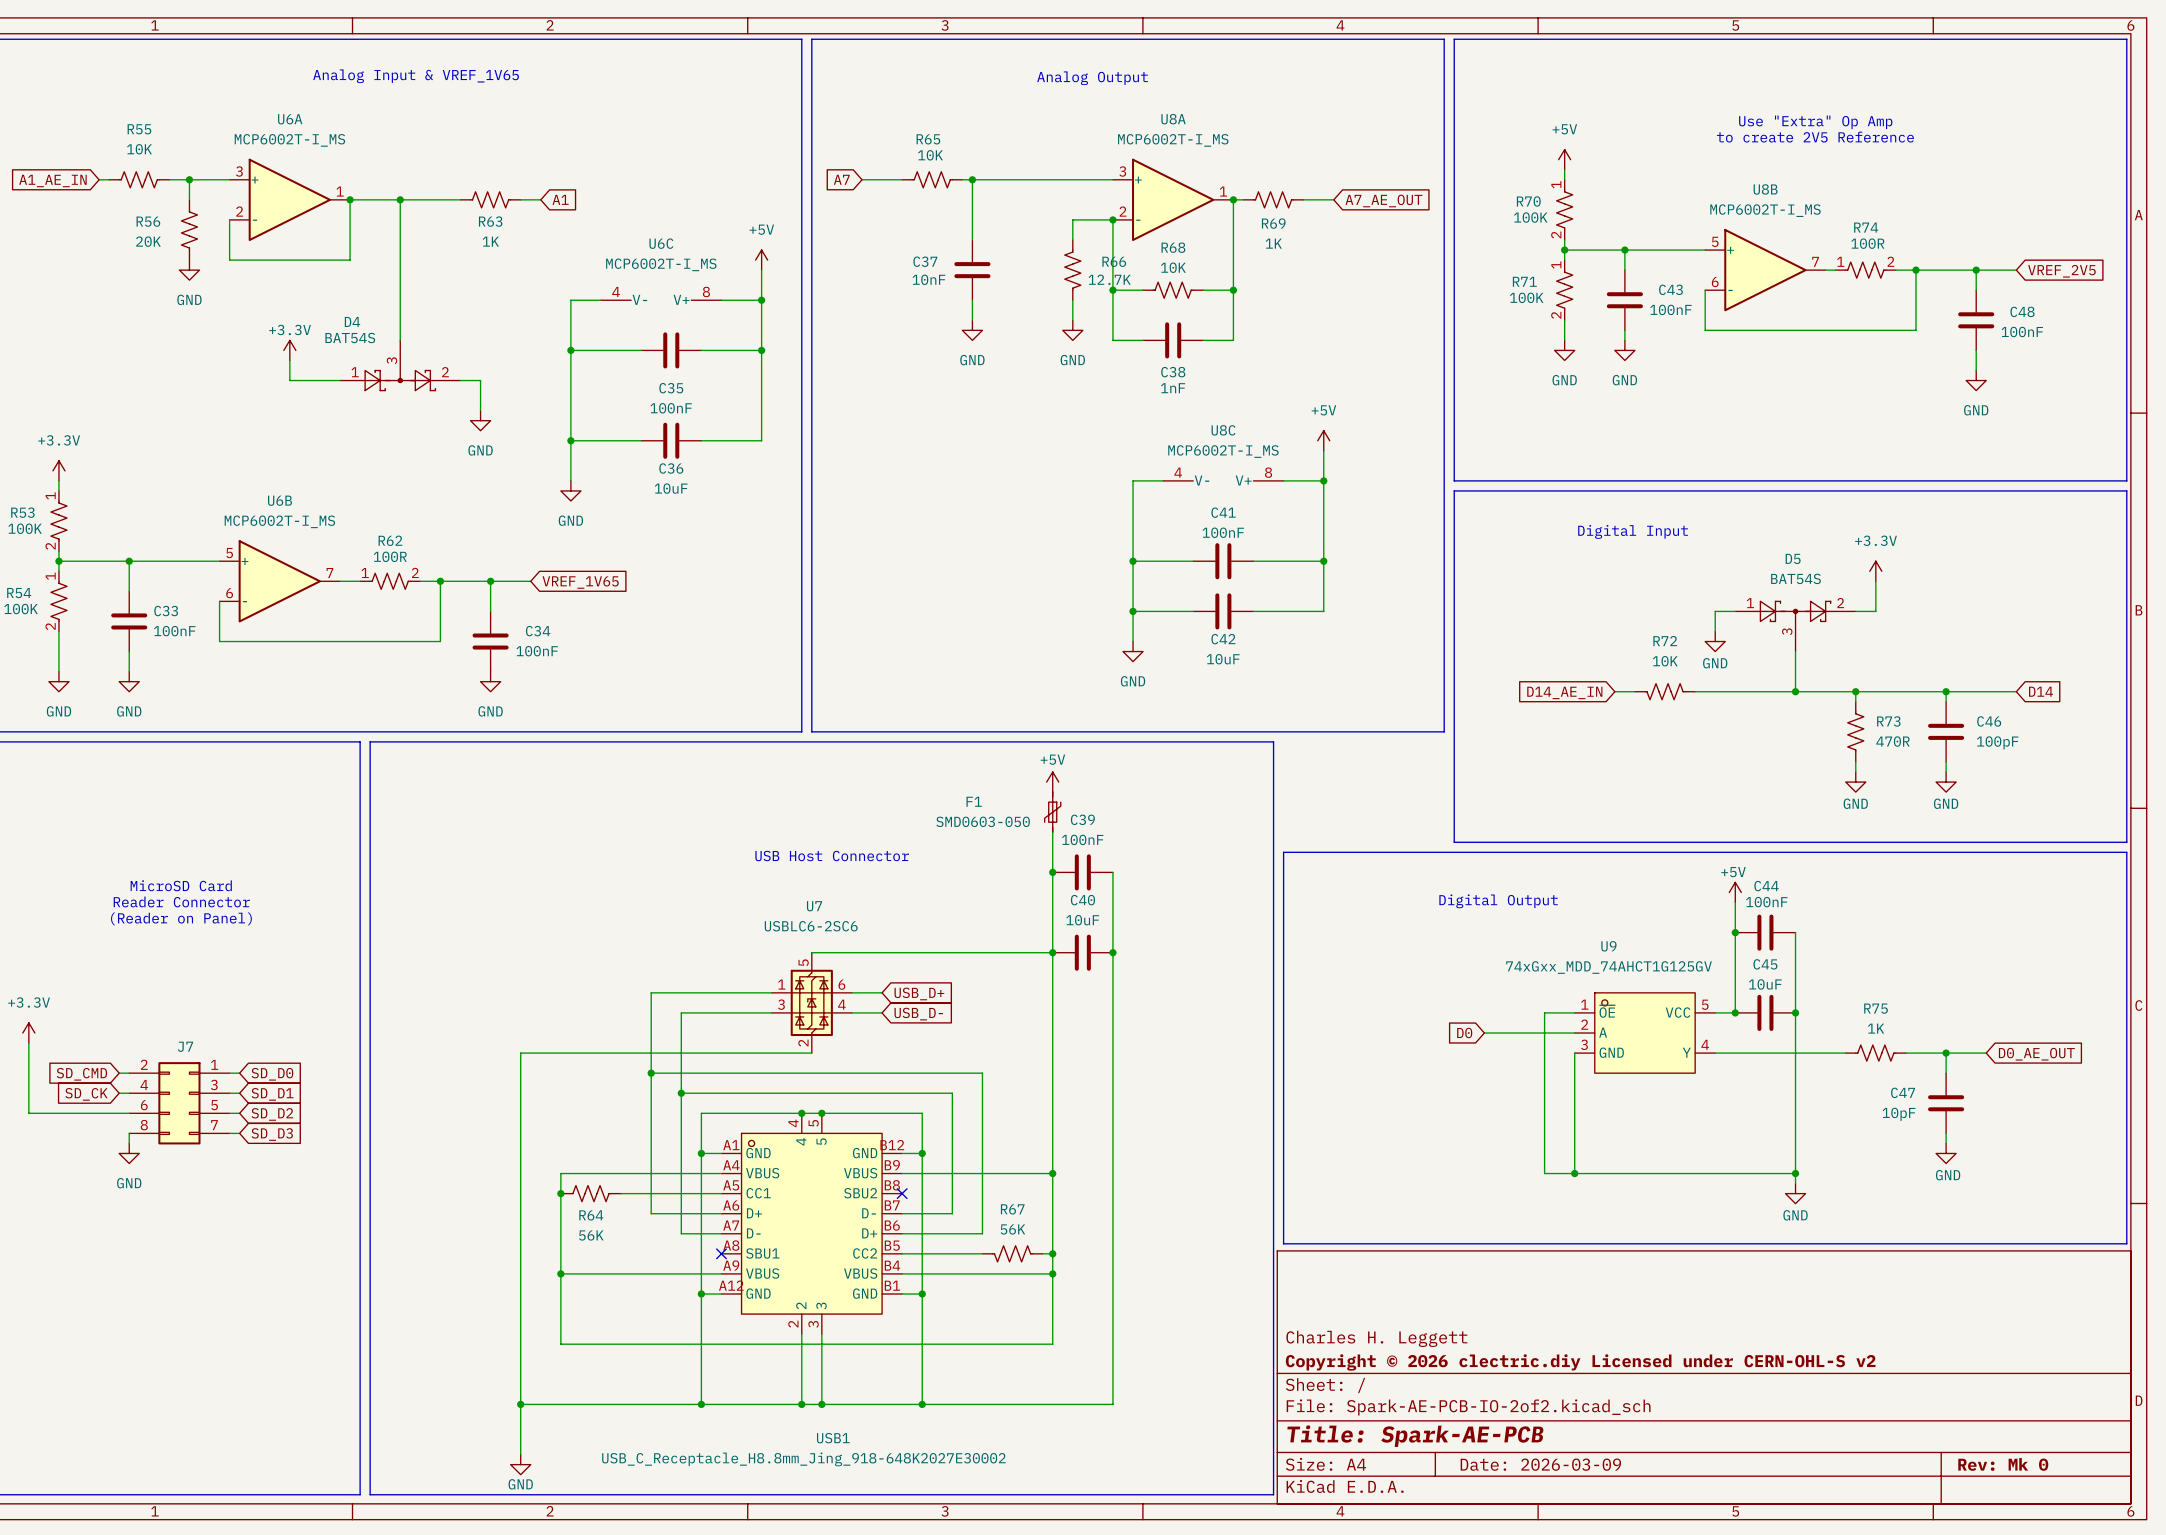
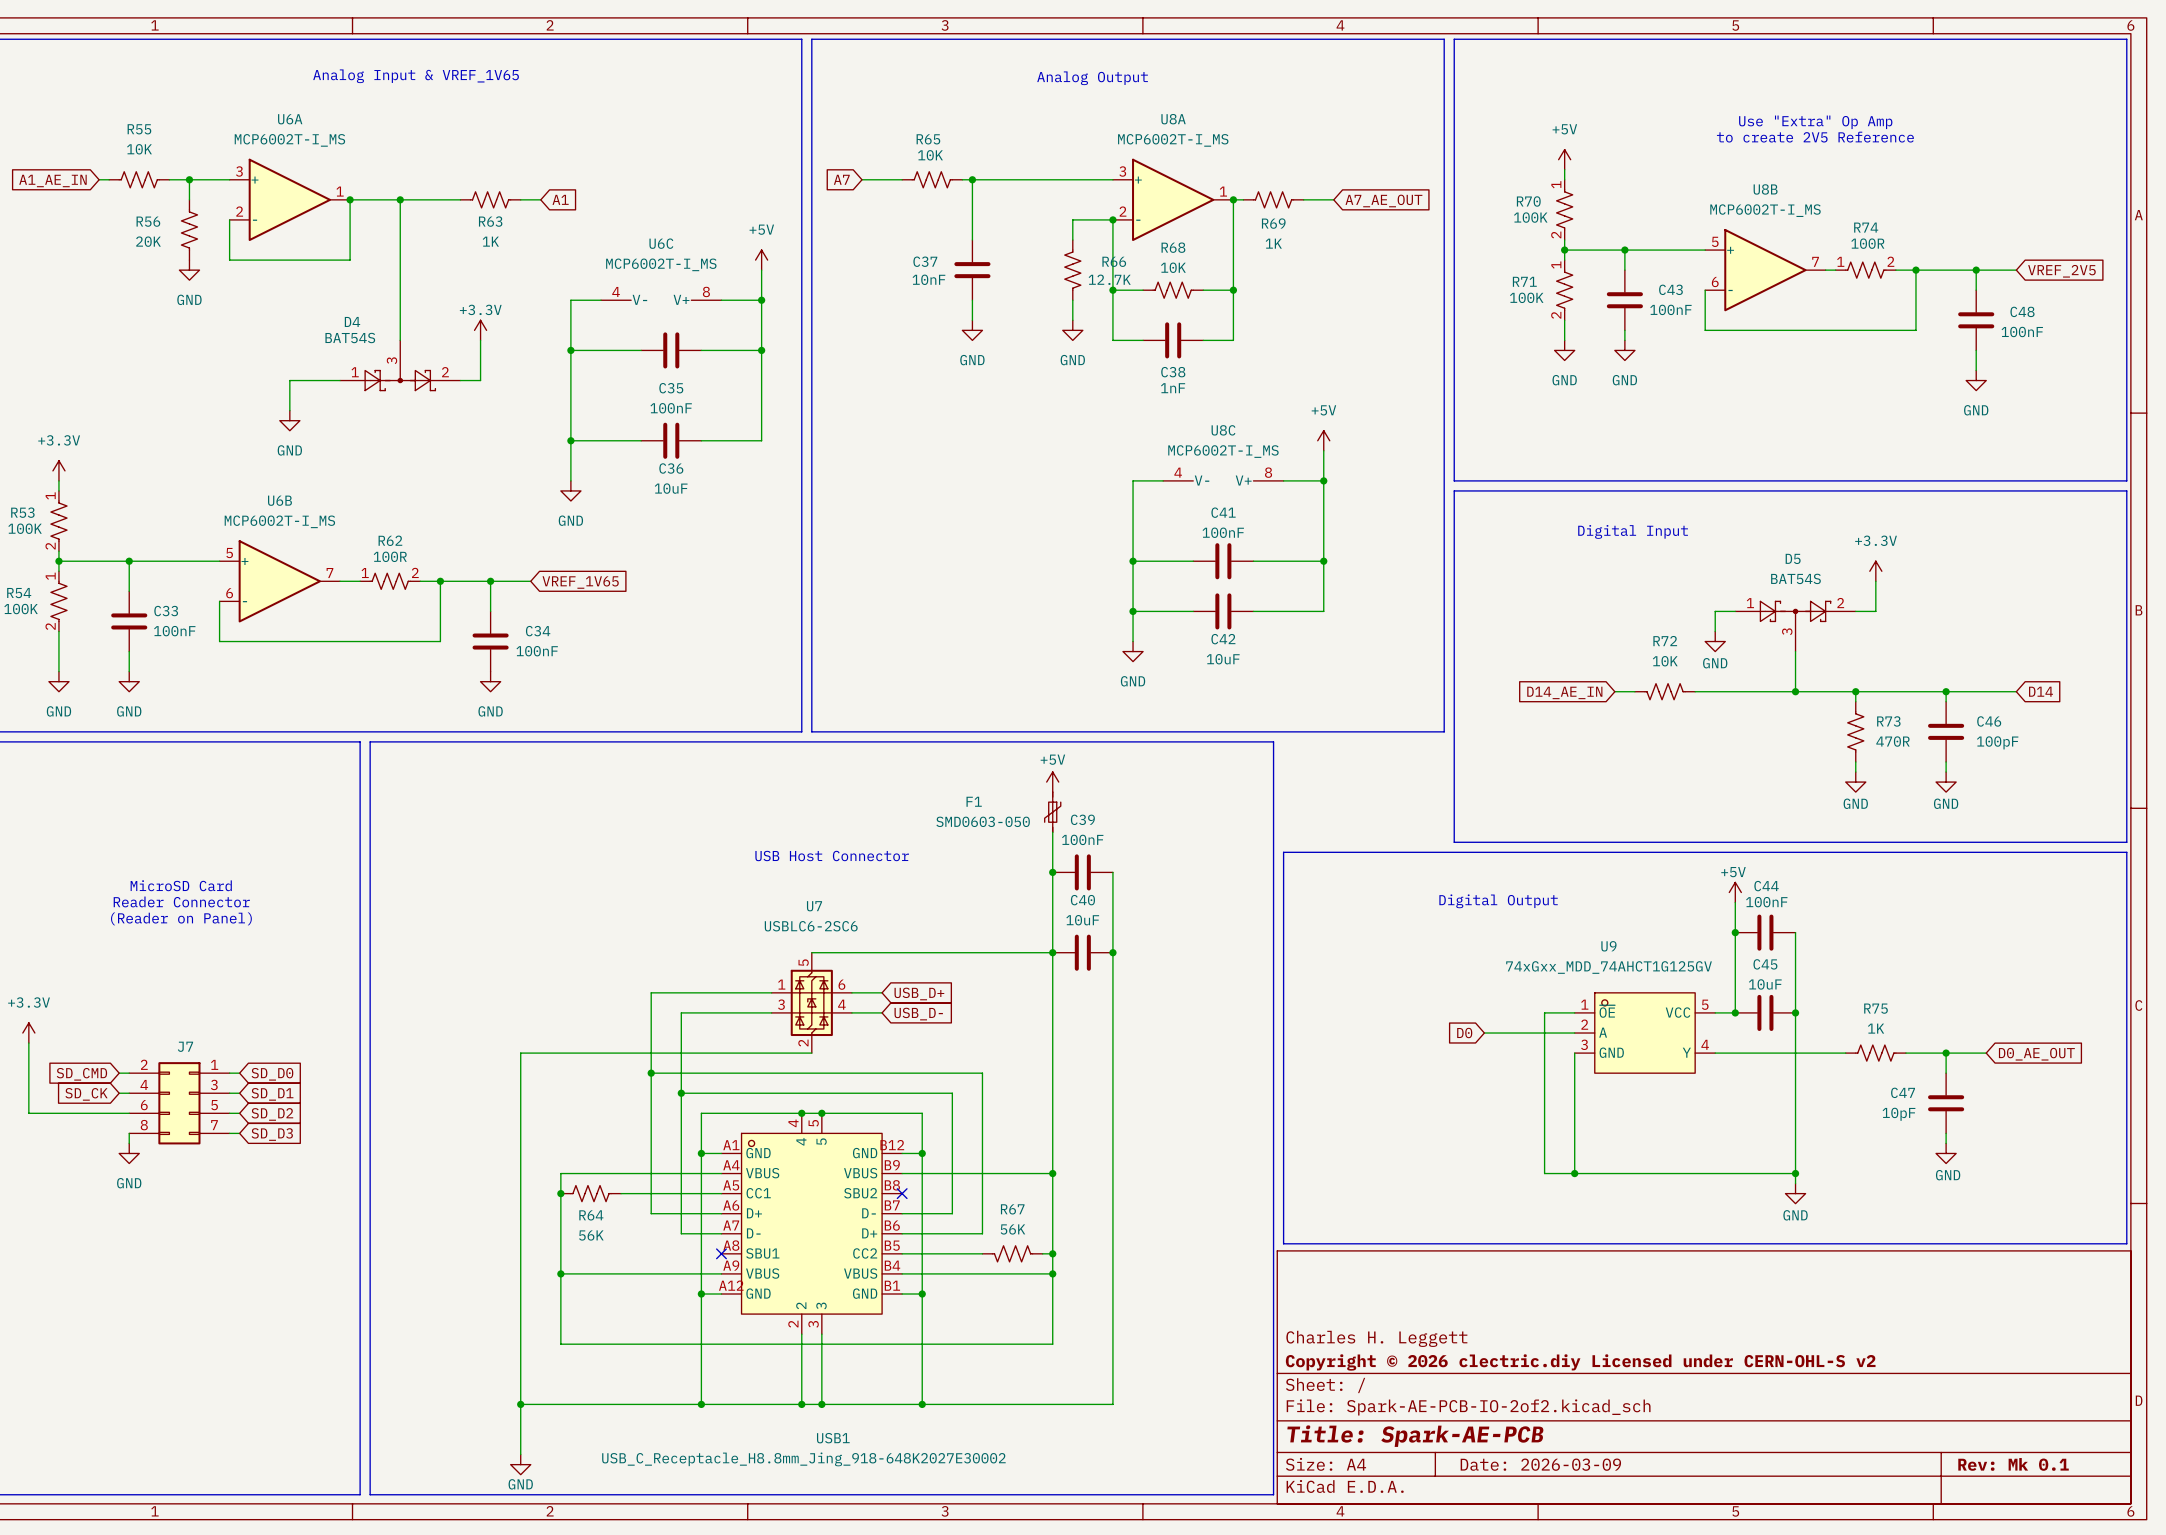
power symbol position: +3.3V (289, 350) -> +3.3V (480, 330)
wire: (289, 360) (289, 380) -> (289, 410) (289, 380)
wire: (480, 380) (480, 410) -> (480, 380) (480, 340)
power symbol position: GND (480, 420) -> GND (289, 420)
title block: Rev: Mk 0 (2003, 1464) -> Rev: Mk 0.1 (2013, 1464)

